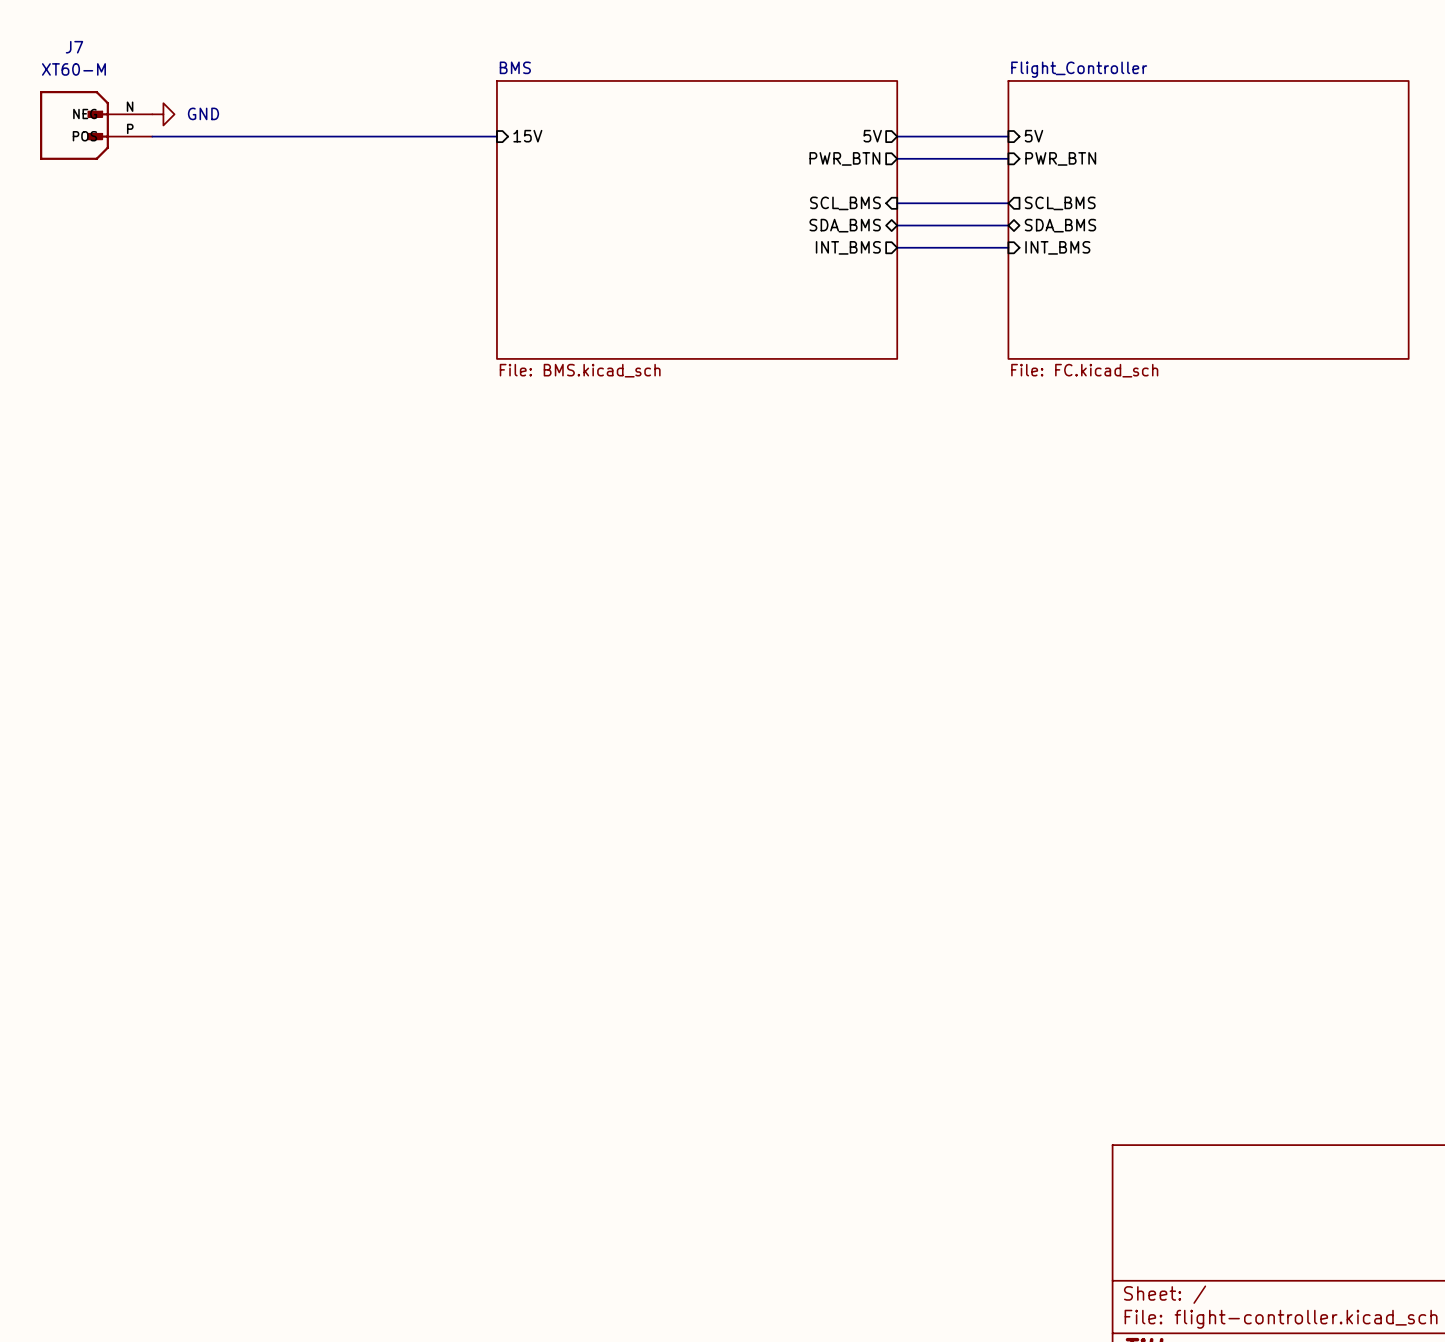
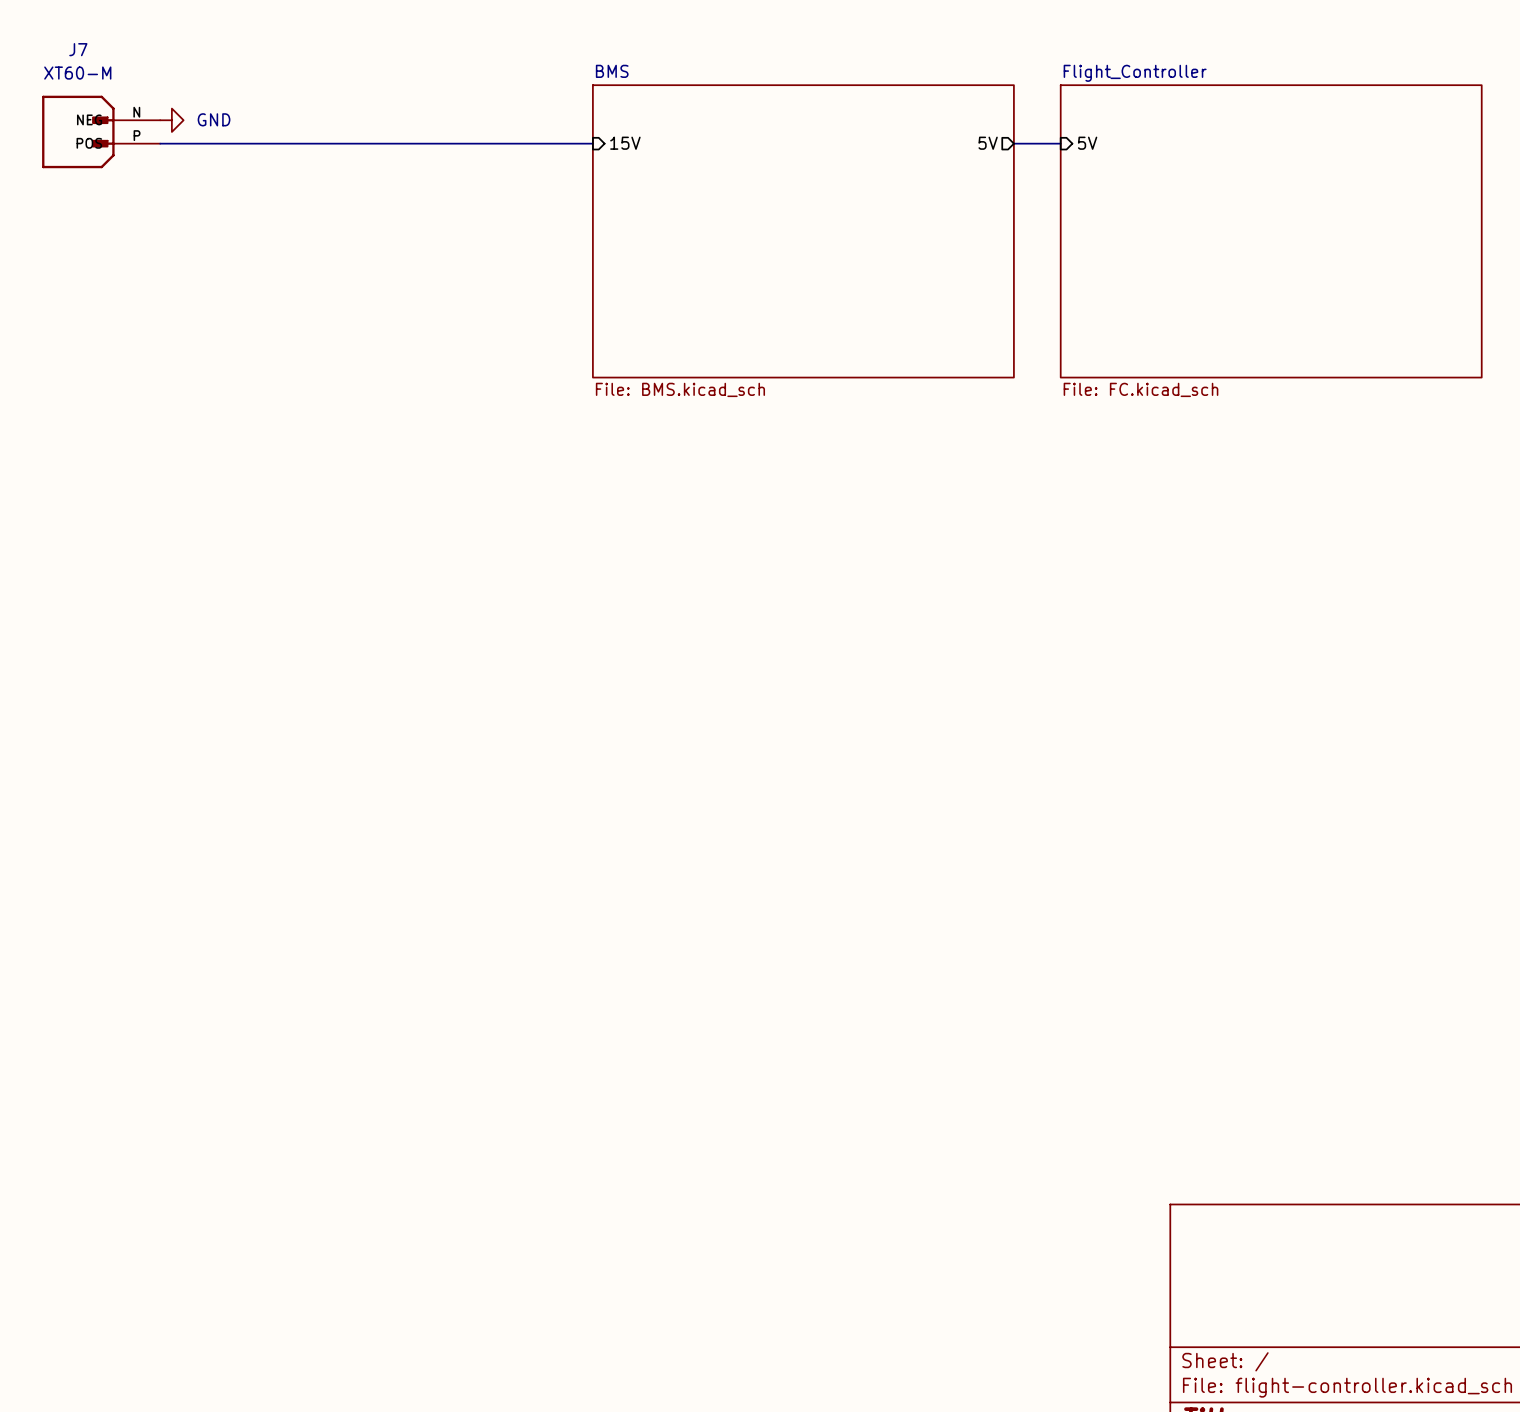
wire: none -> (522, 143) (592, 143)
sheet pin position: 15V (527, 136) -> 15V (625, 143)
sheet pin position: 5V (872, 136) -> 5V (988, 143)
wire: (897, 136) (963, 136) -> none
sheet pin: PWR_BTN (844, 158) -> none
wire: (897, 158) (1008, 158) -> none
sheet pin: PWR_BTN (1060, 158) -> none
sheet pin: SCL_BMS (845, 203) -> none
wire: (897, 203) (1008, 203) -> none
sheet pin: SCL_BMS (1060, 203) -> none
sheet BMS position: (697, 219) -> (803, 231)
sheet pin: SDA_BMS (845, 225) -> none
wire: (897, 225) (1008, 225) -> none
sheet pin: SDA_BMS (1060, 225) -> none
sheet pin: INT_BMS (848, 247) -> none
wire: (897, 247) (1008, 247) -> none
sheet pin: INT_BMS (1057, 247) -> none

